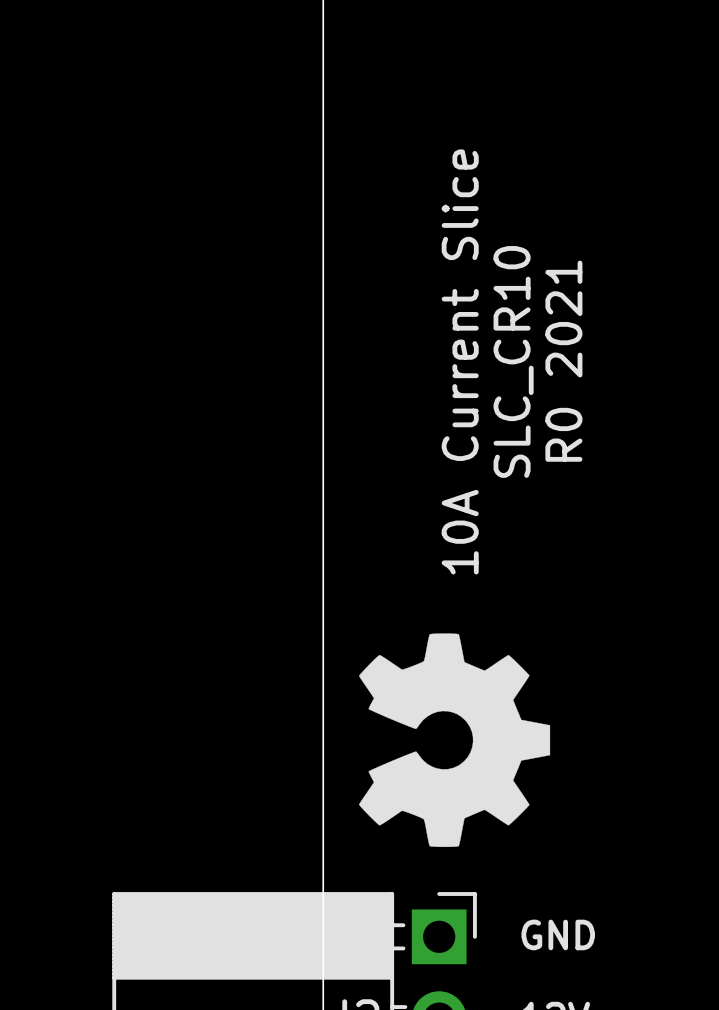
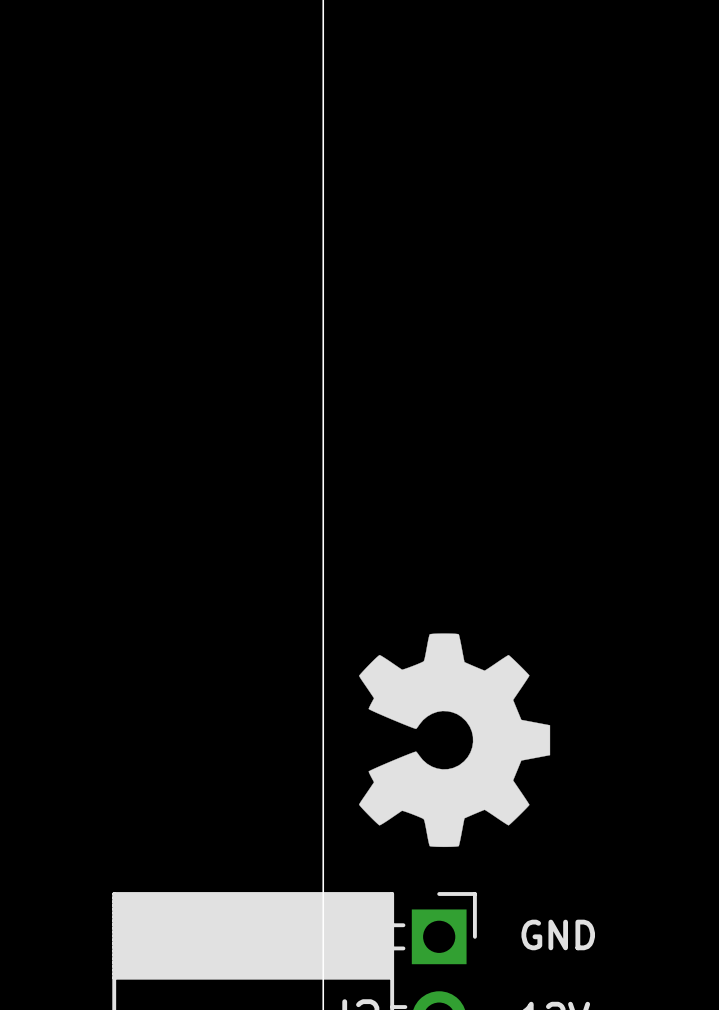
text: 10A Current Slice (460, 361) -> none
text: SLC_CR10 (513, 361) -> none
text: R0 2021 (563, 361) -> none

